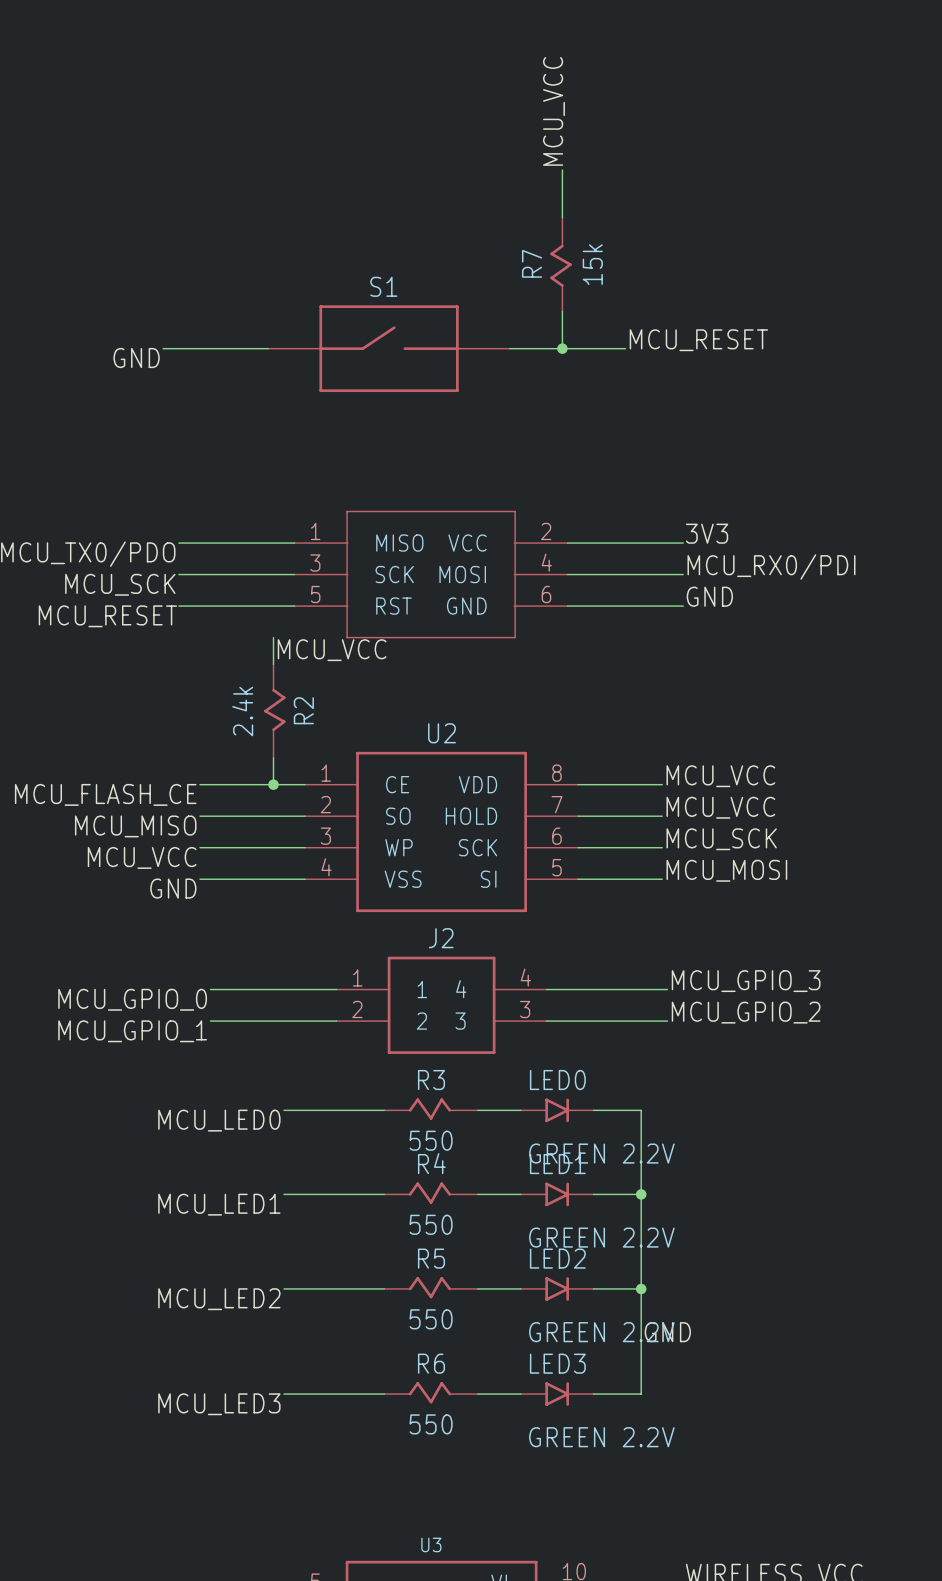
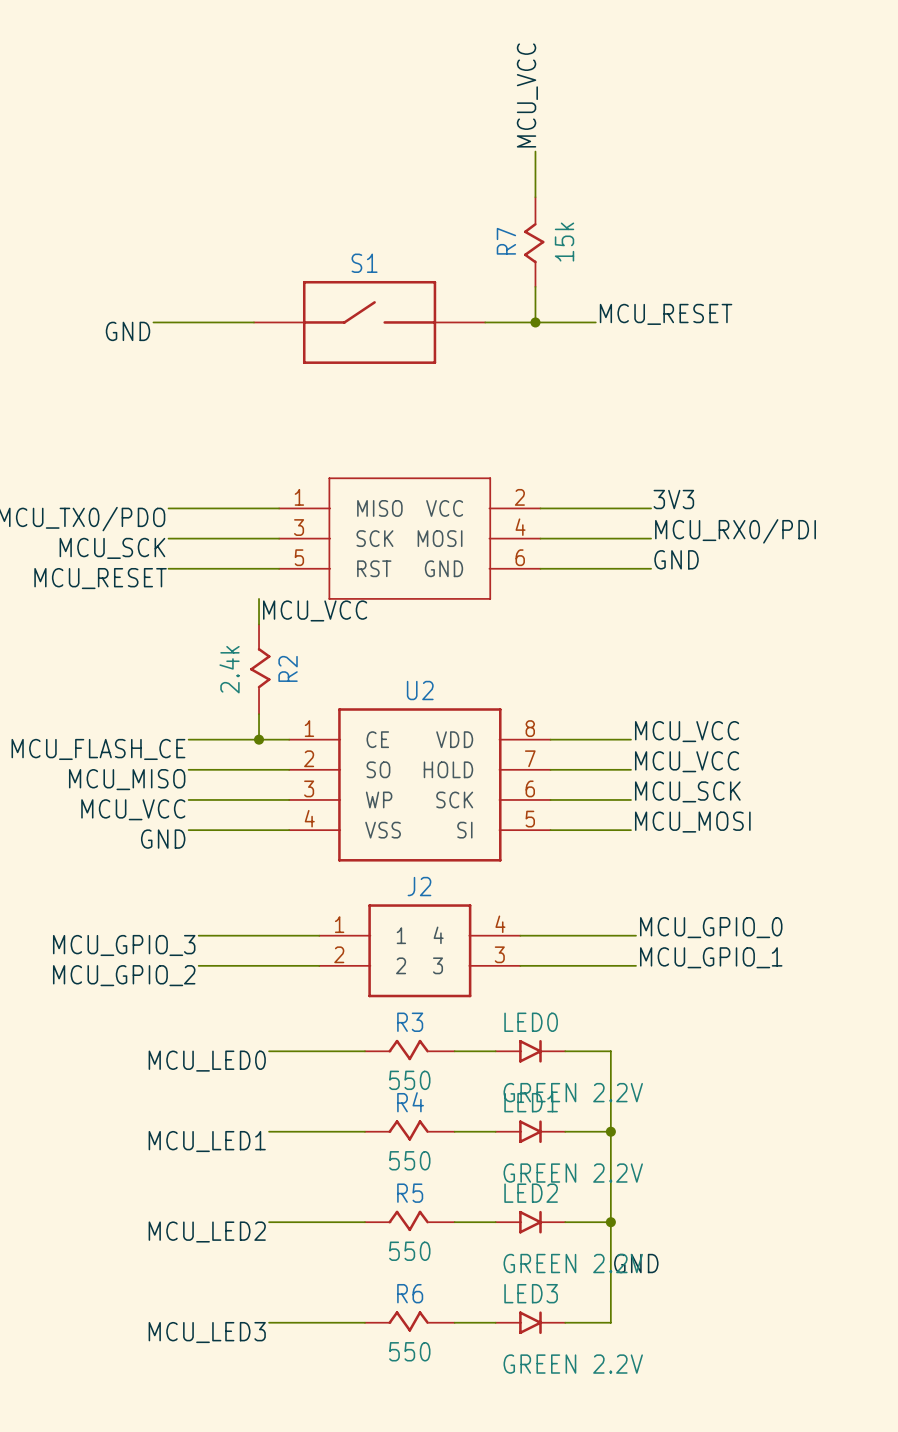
label: MCU_GPIO_3 (746, 981) -> MCU_GPIO_0 (711, 927)
label: MCU_GPIO_0 (132, 999) -> MCU_GPIO_3 (124, 945)
label: MCU_GPIO_2 (746, 1012) -> MCU_GPIO_1 (711, 957)
label: MCU_GPIO_1 (132, 1031) -> MCU_GPIO_2 (124, 975)

